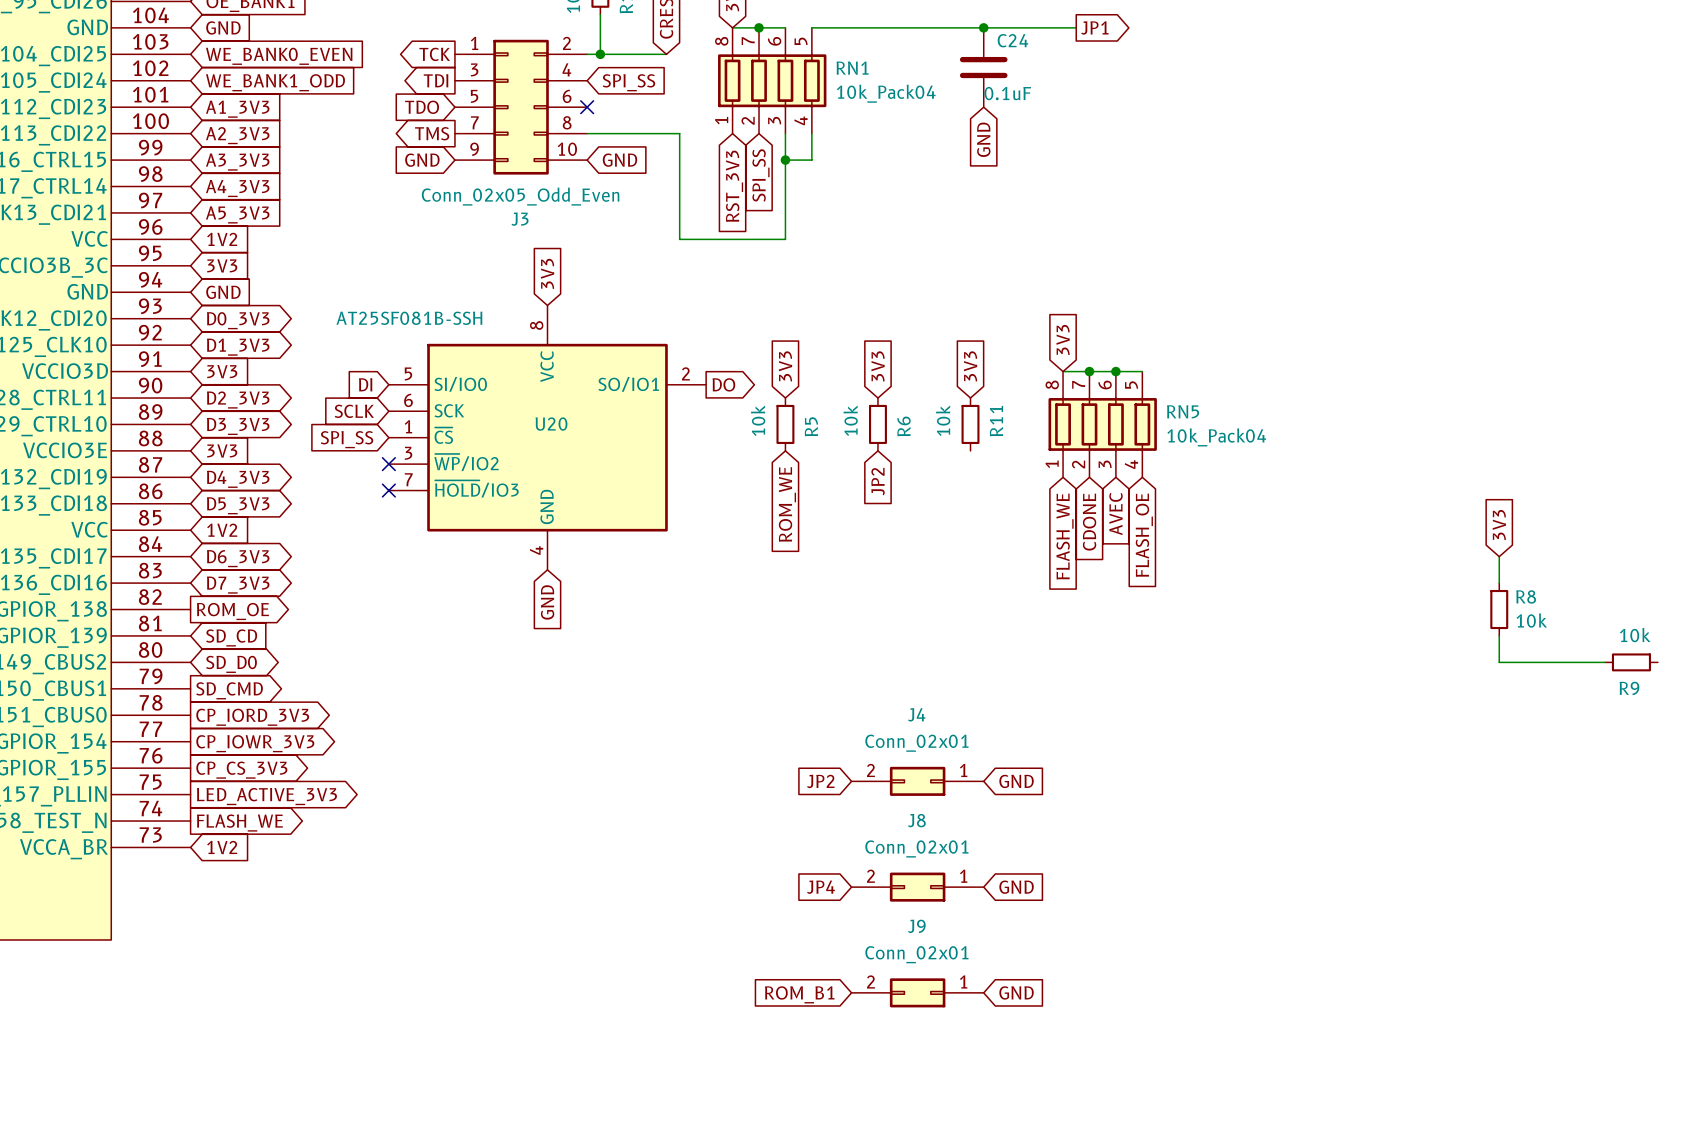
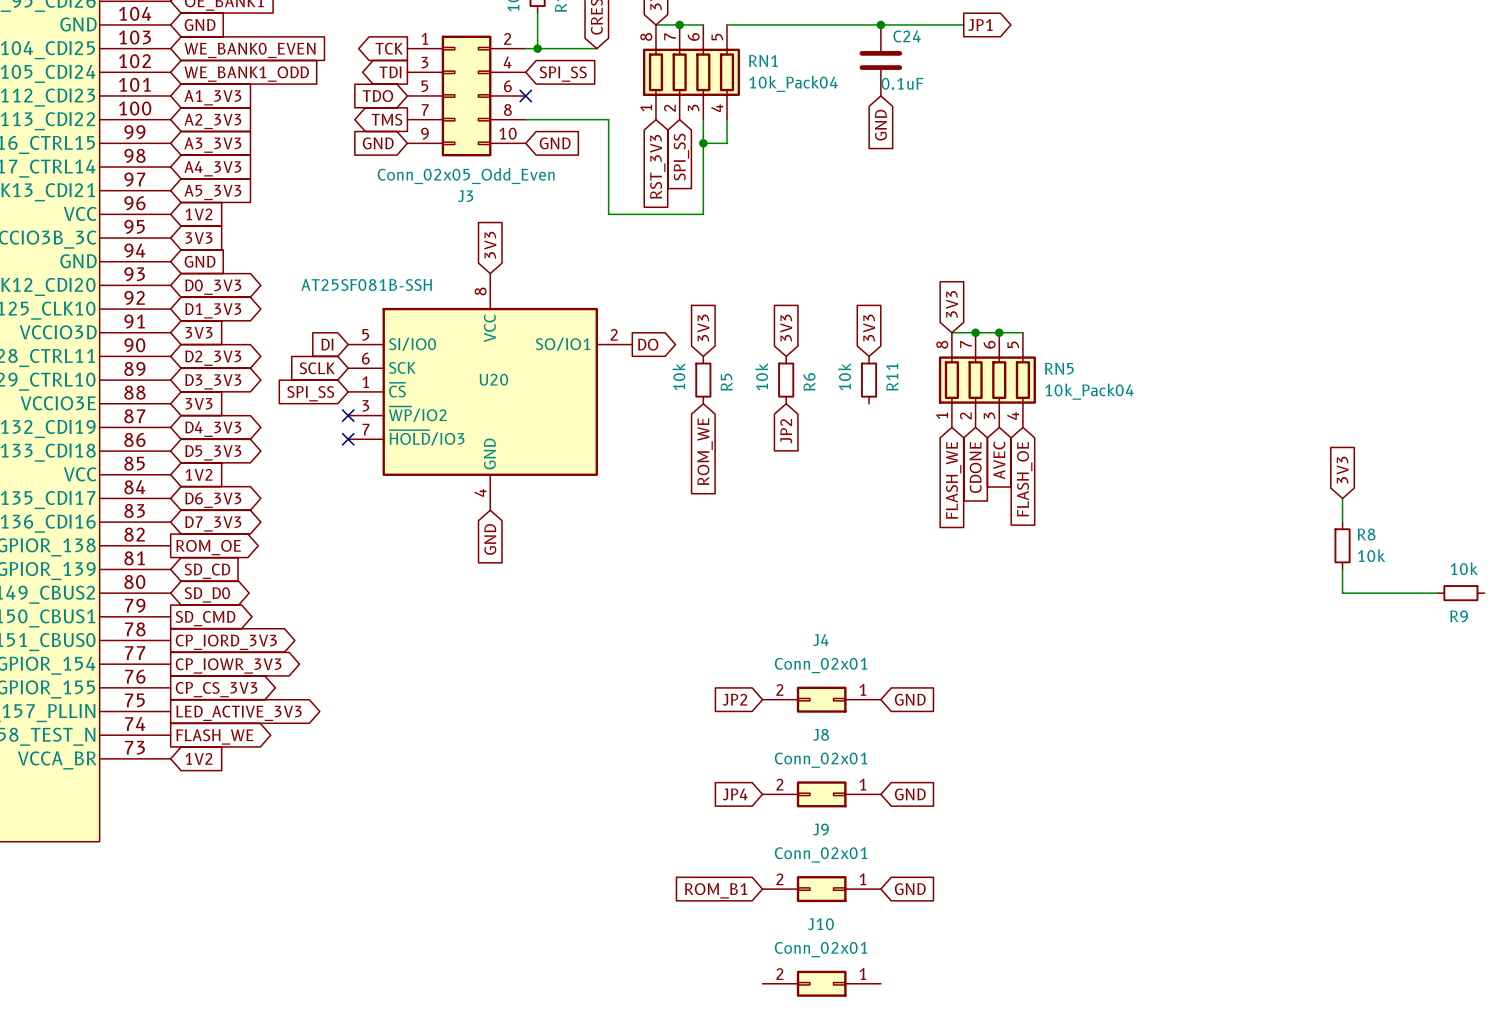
J10: none -> Conn_02x01 (821, 983)

